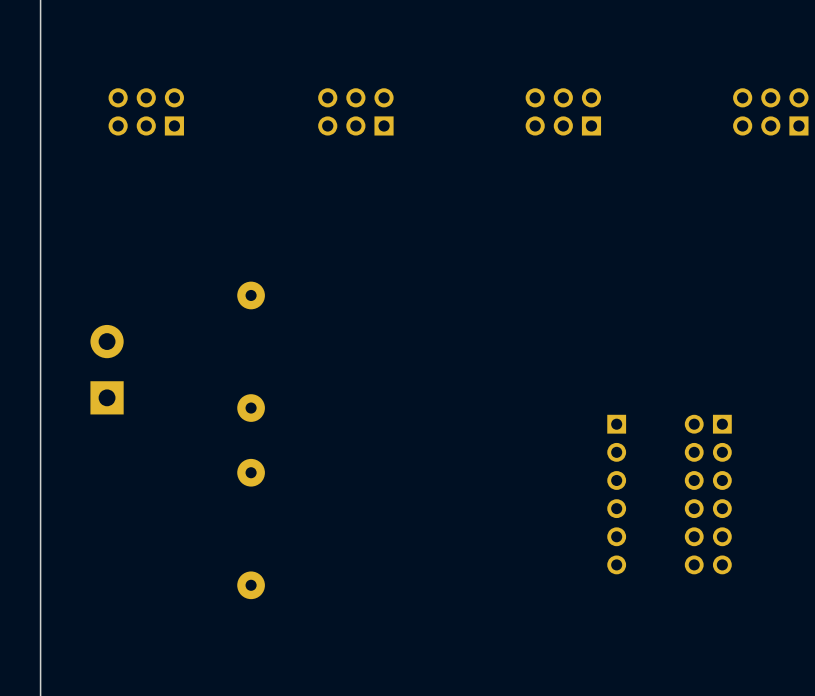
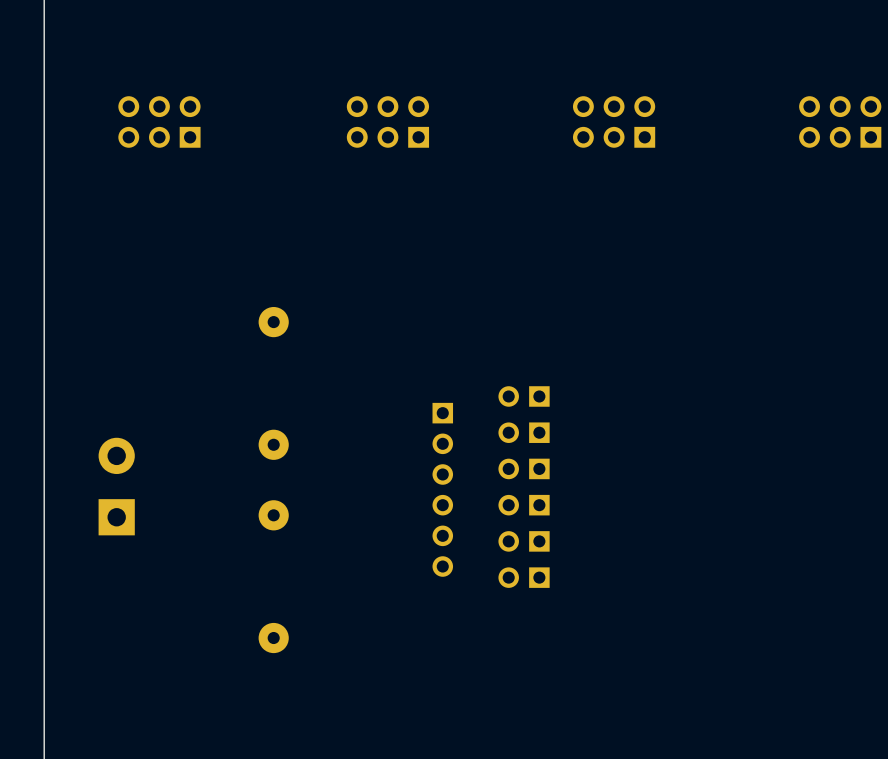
part: none -> (524, 396)
part position: (107, 369) -> (116, 486)
part: none -> (524, 432)
part: none -> (524, 468)
part: none -> (524, 505)
part position: (616, 494) -> (442, 489)
part: (708, 494) -> none
part: none -> (524, 541)
part: none -> (524, 577)

